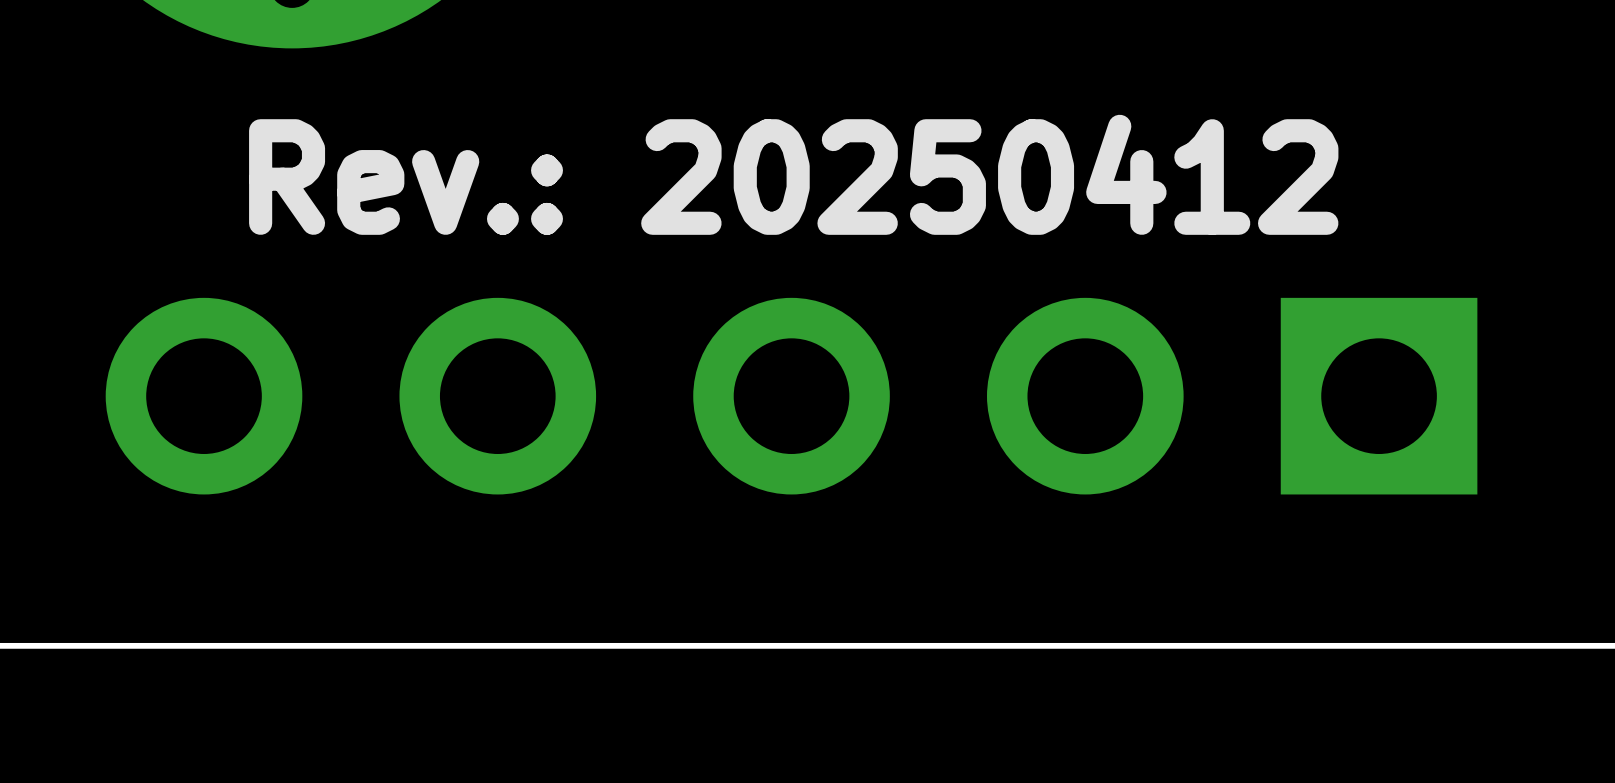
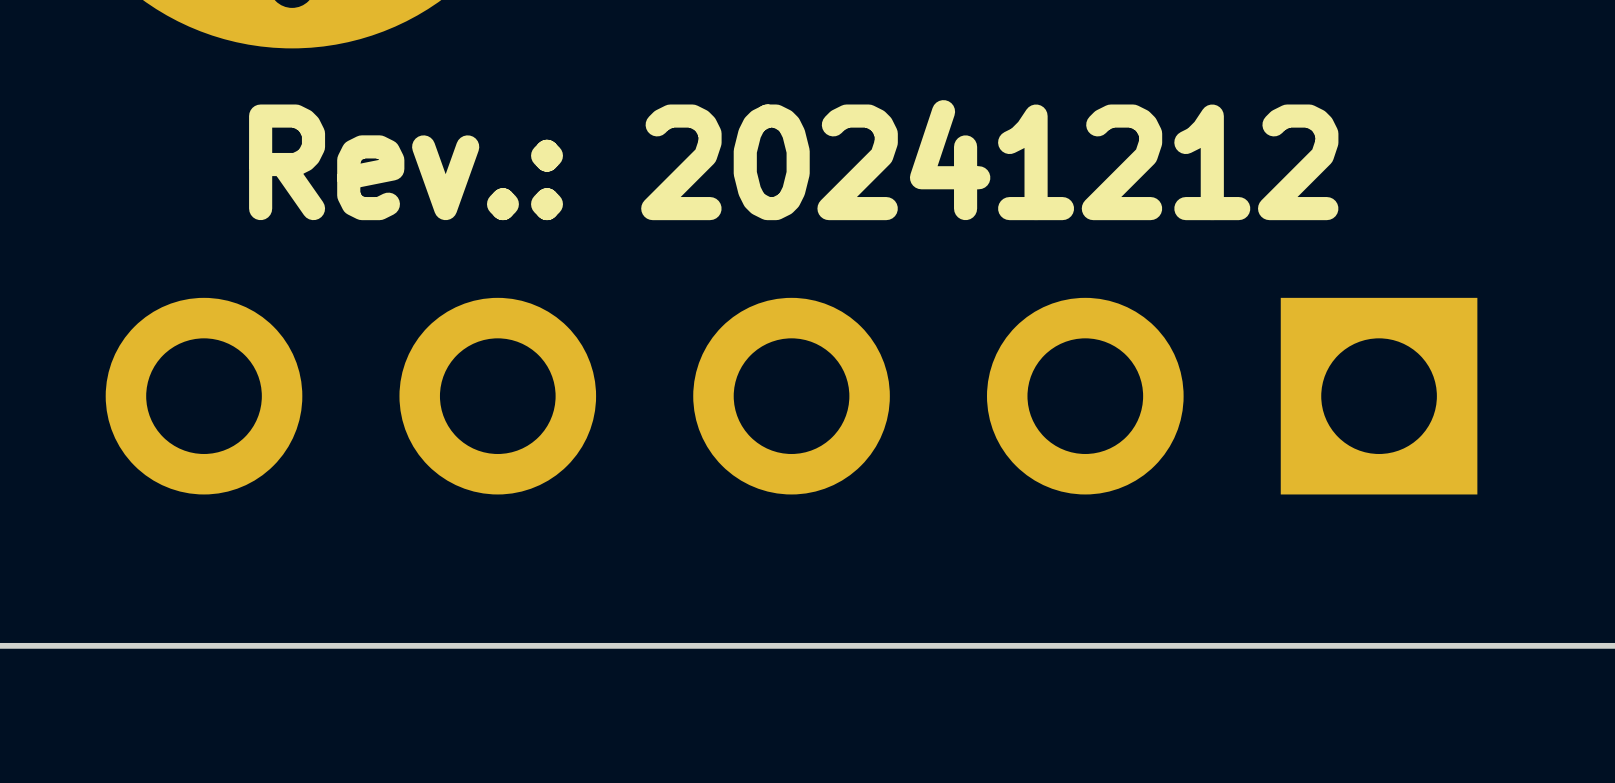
text: Rev.: 20250412 (793, 174) -> Rev.: 20241212 (793, 160)

